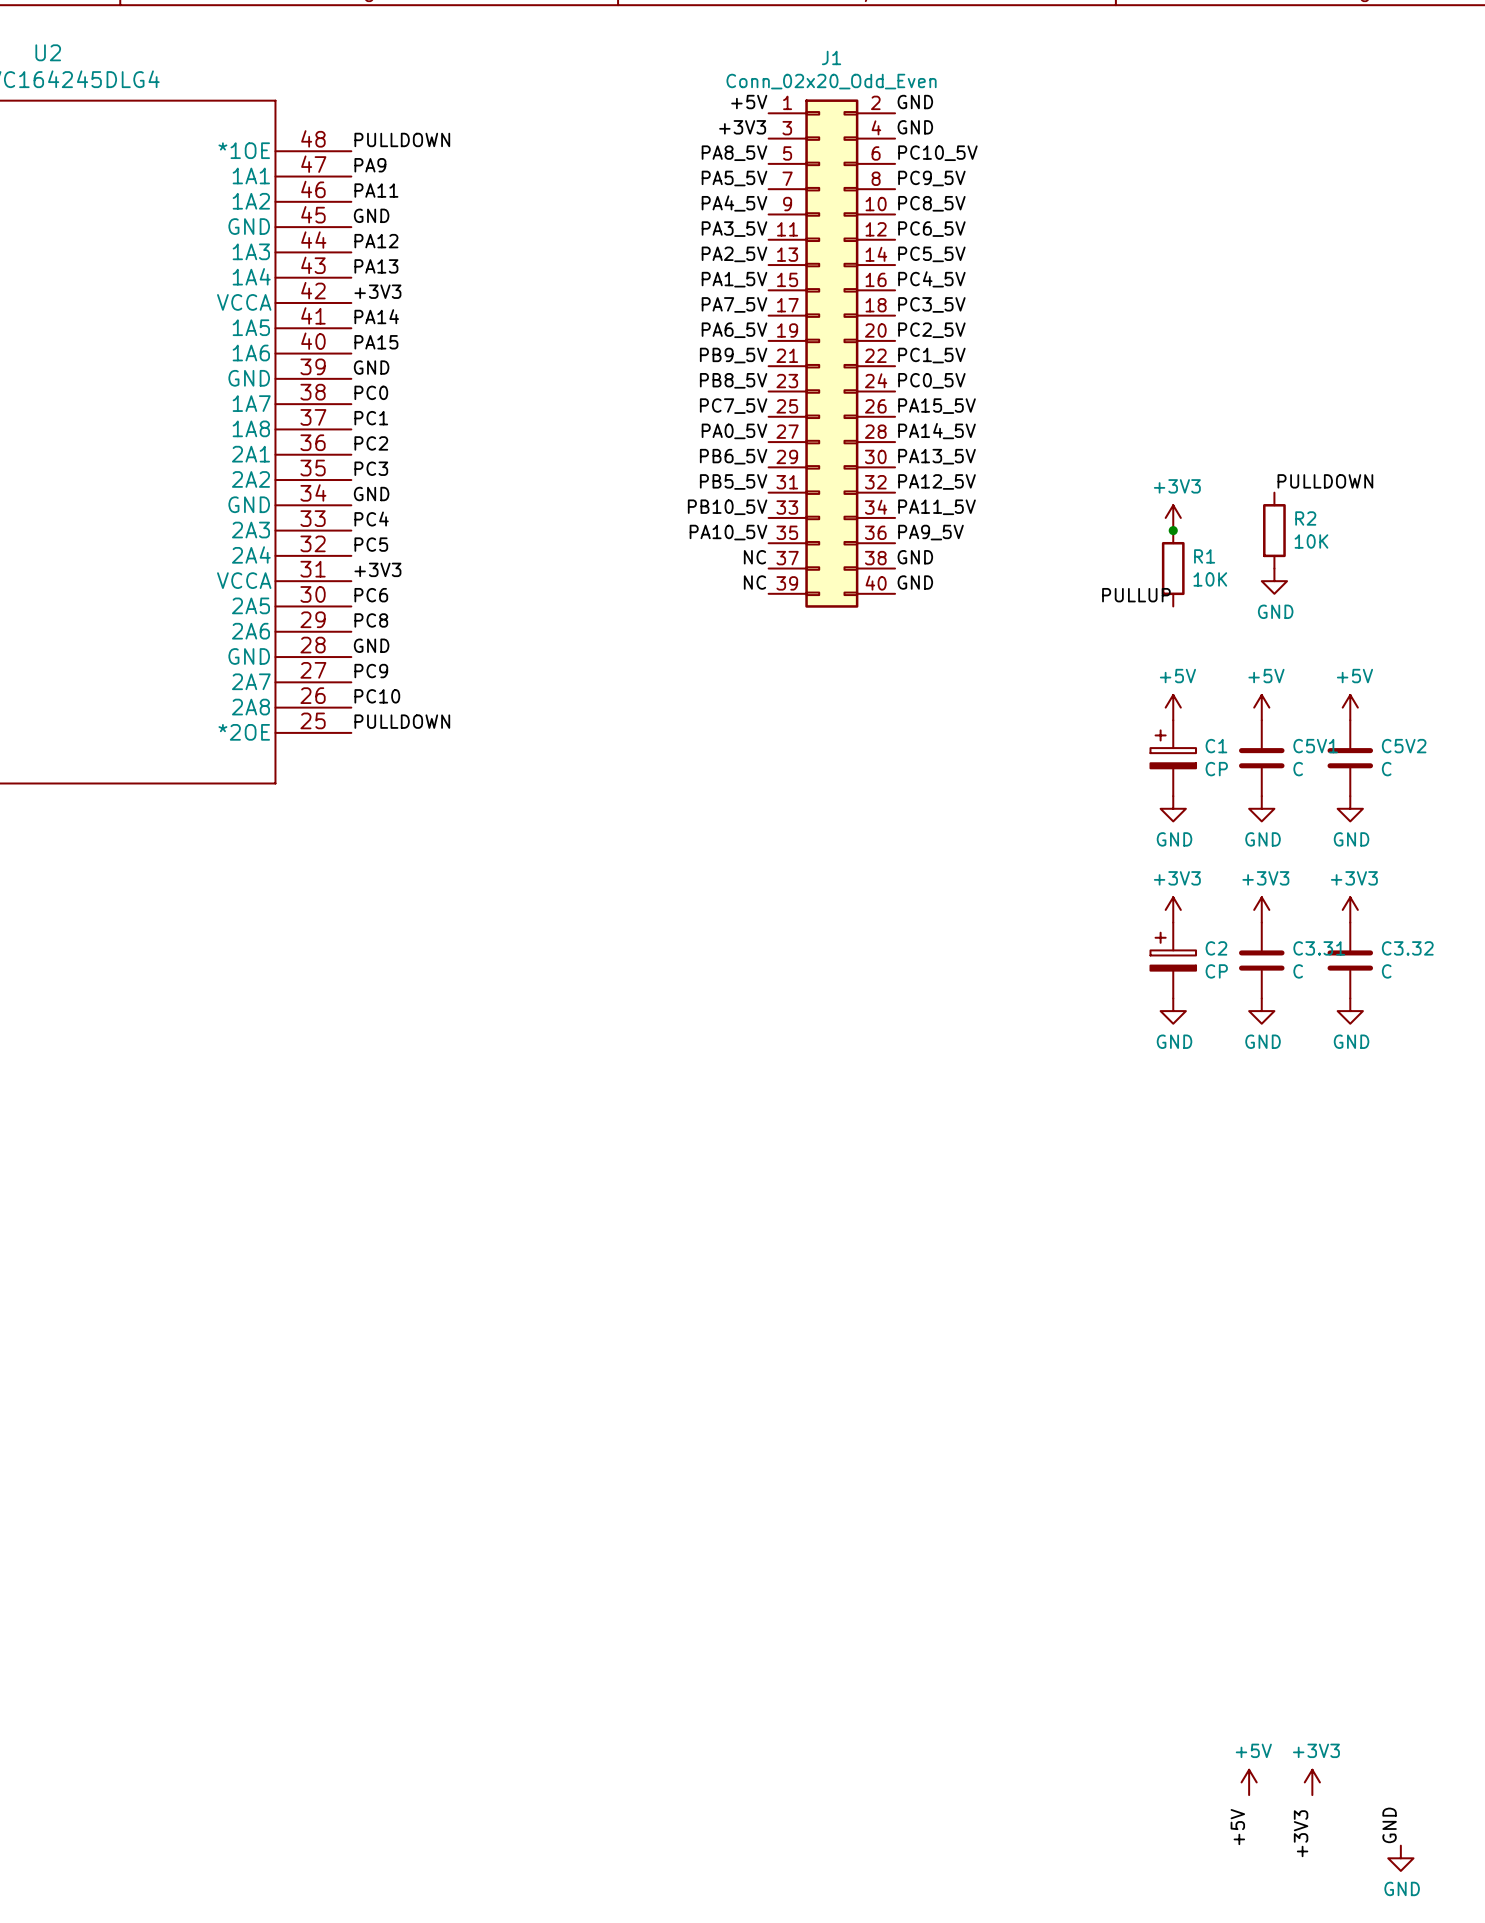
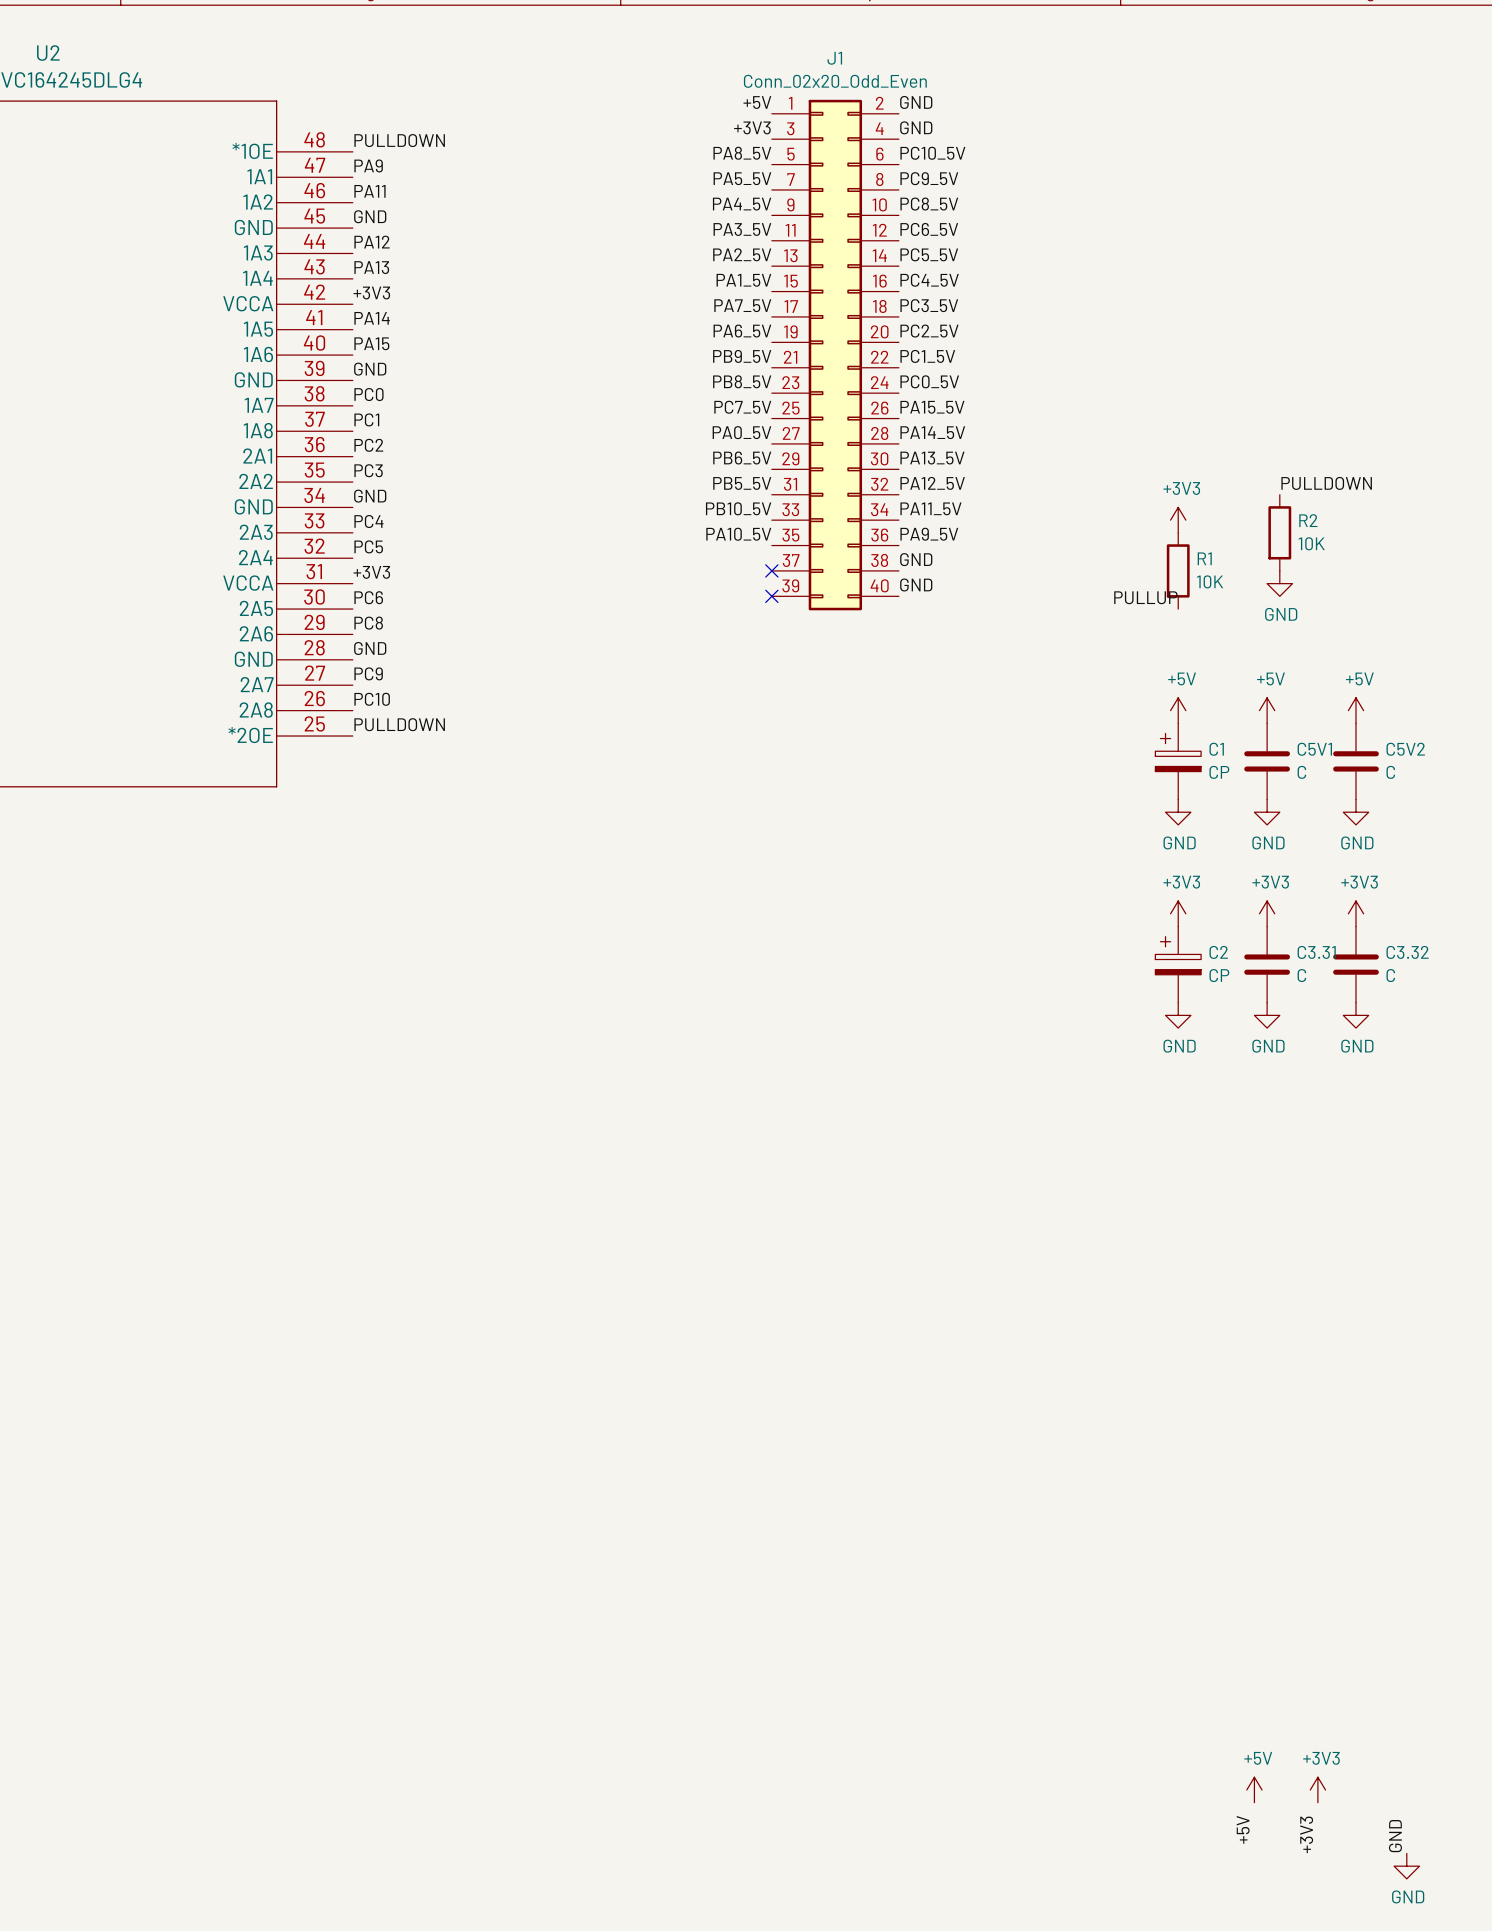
junction: (1173, 530) -> none
label: NC (754, 557) -> none
no-connect mark: none -> (771, 570)
label: NC (754, 582) -> none
no-connect mark: none -> (771, 596)

